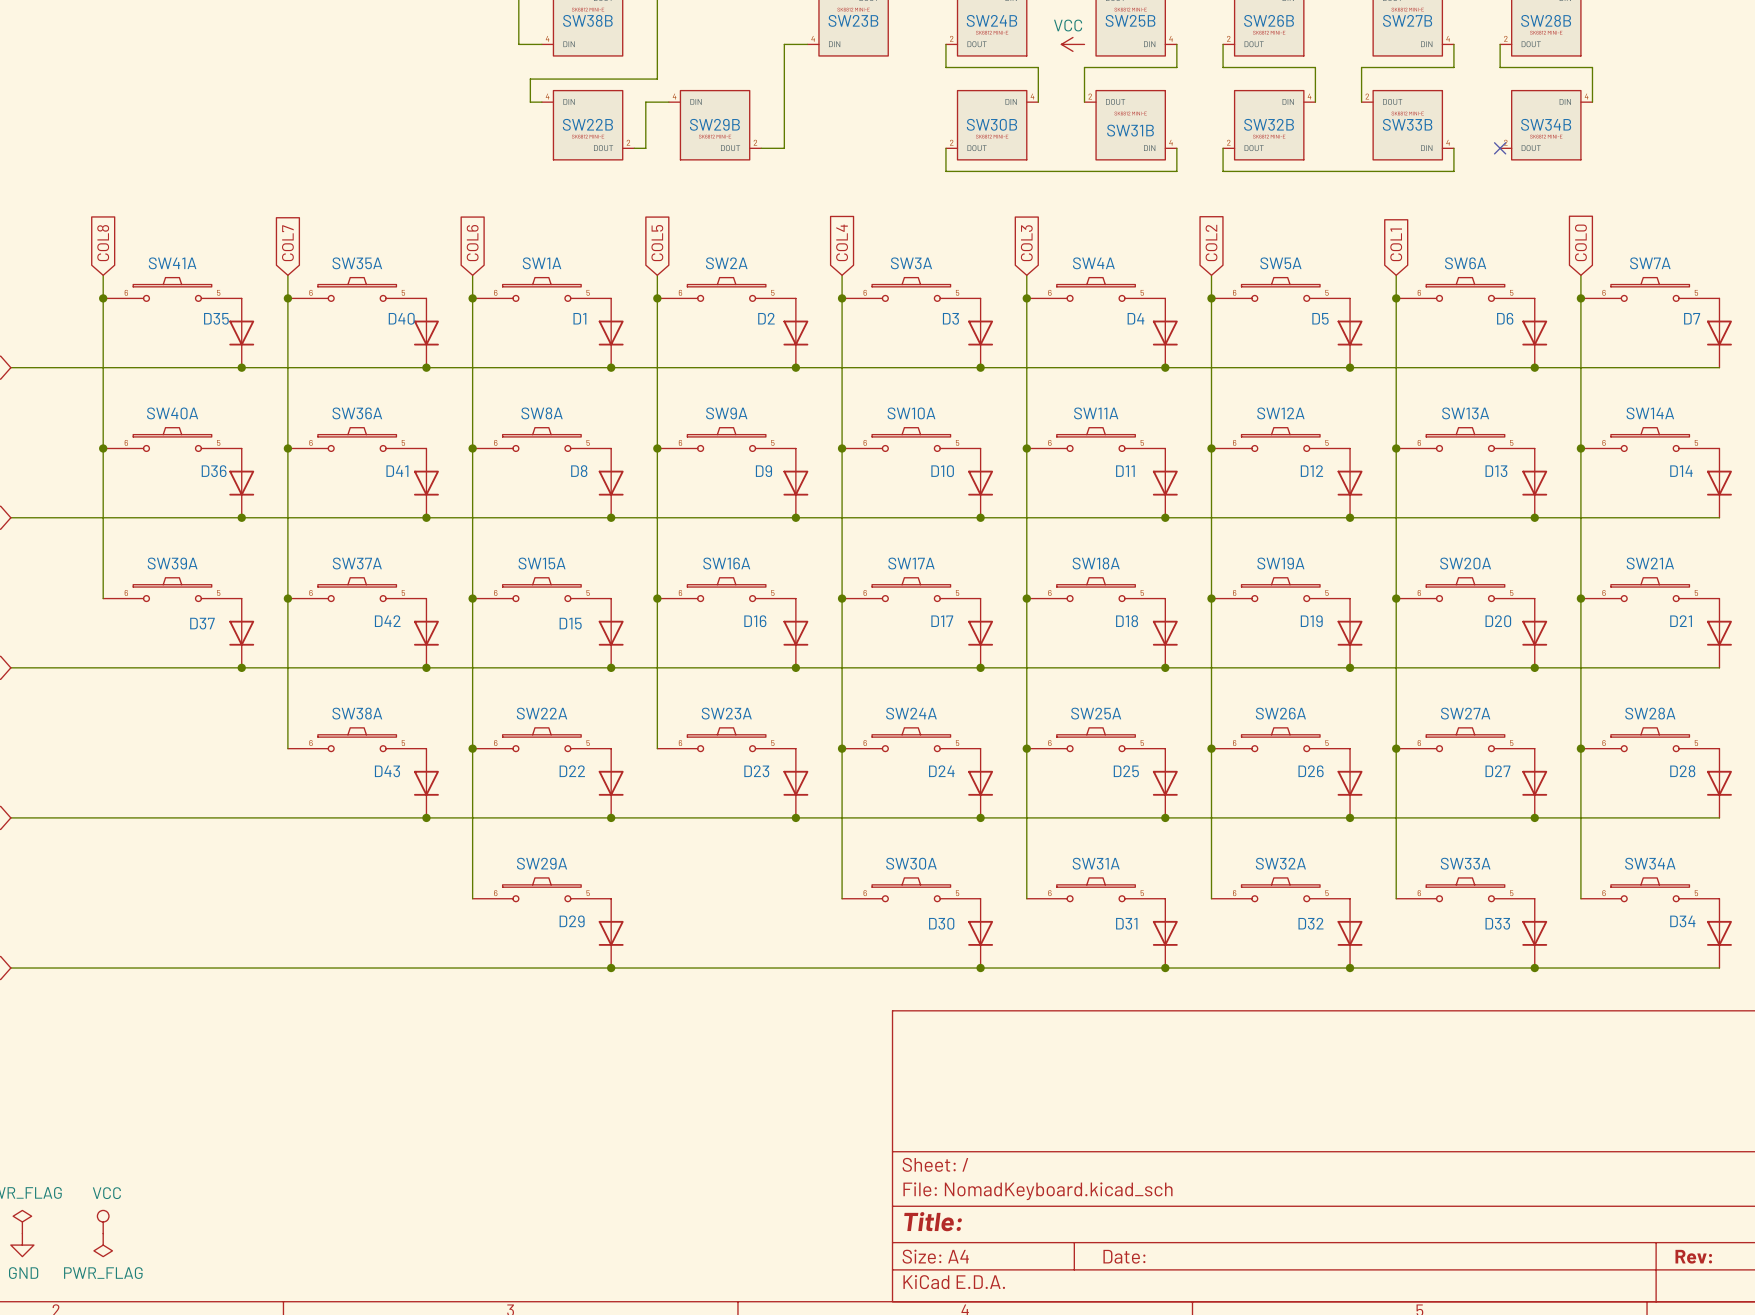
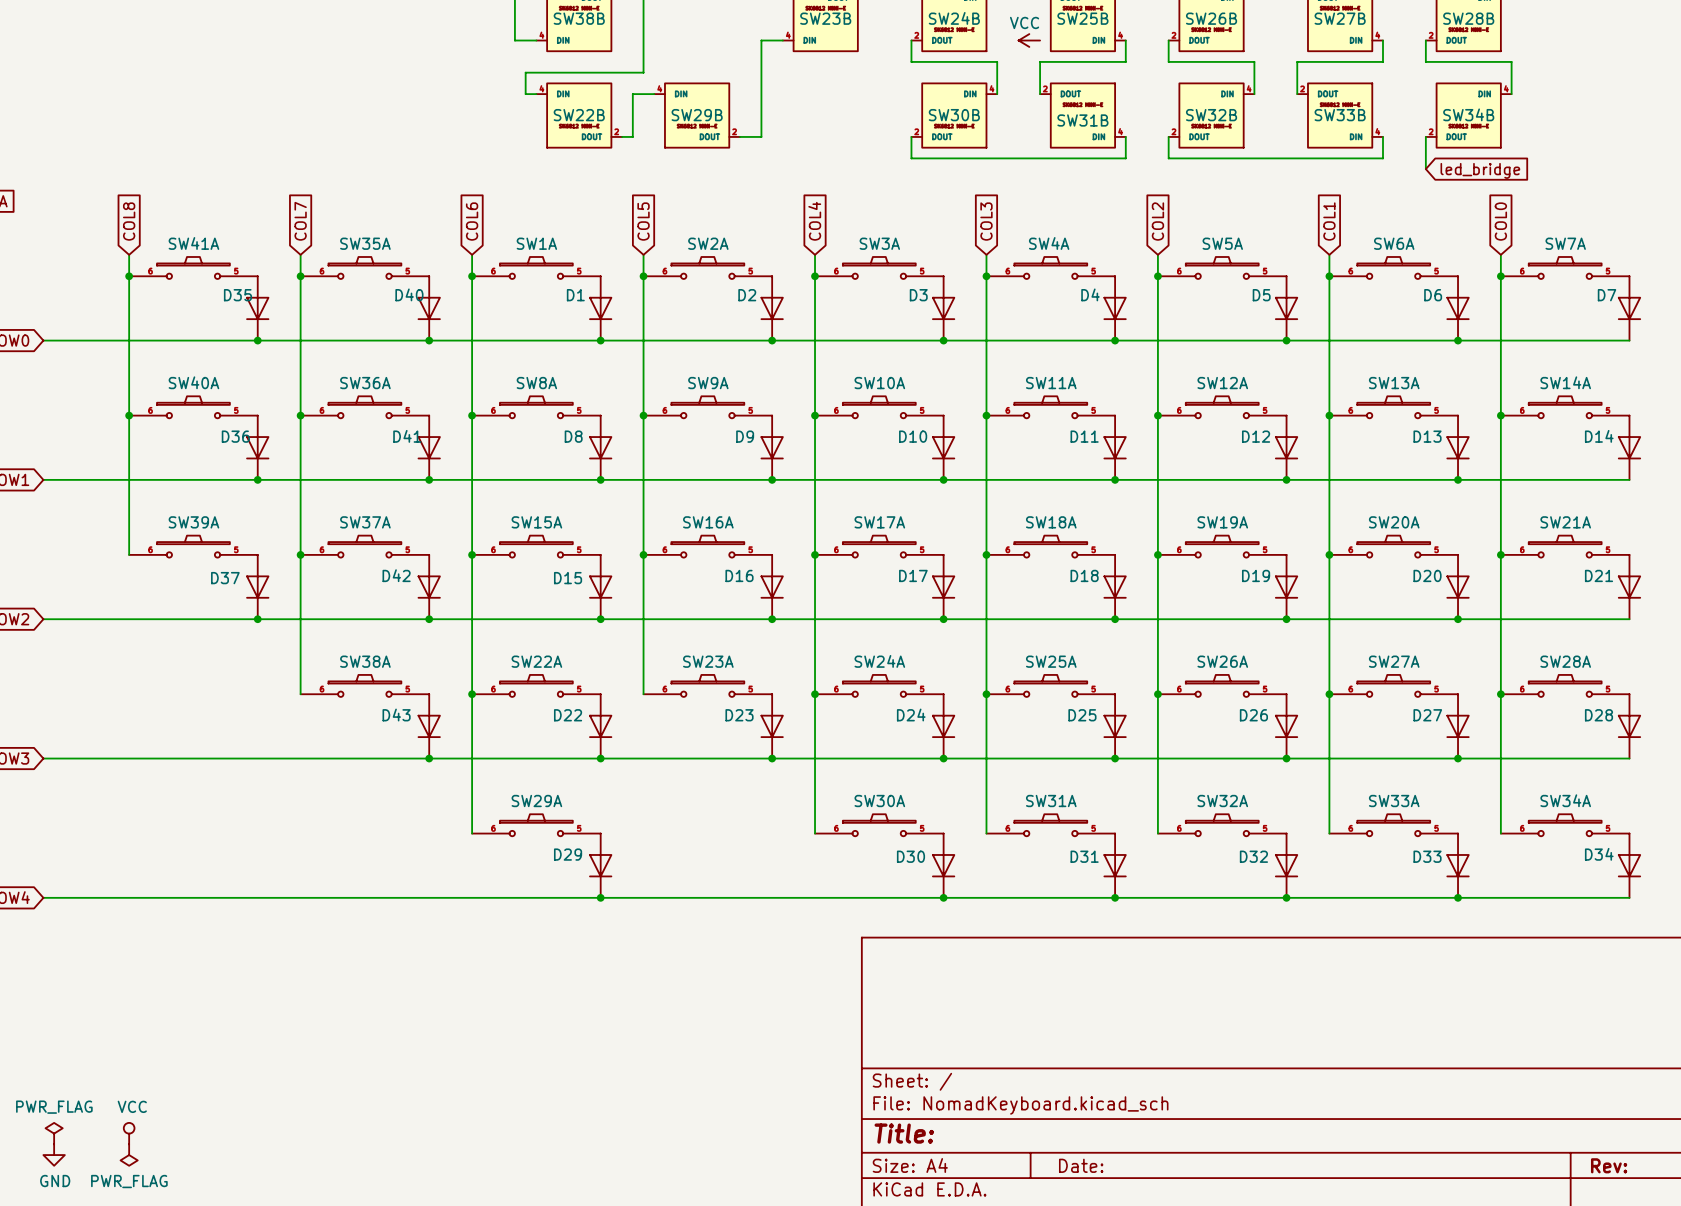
wire: none -> (1425, 136) (1425, 169)
no-connect mark: (1500, 148) -> none
global label: none -> led_bridge (1480, 170)

